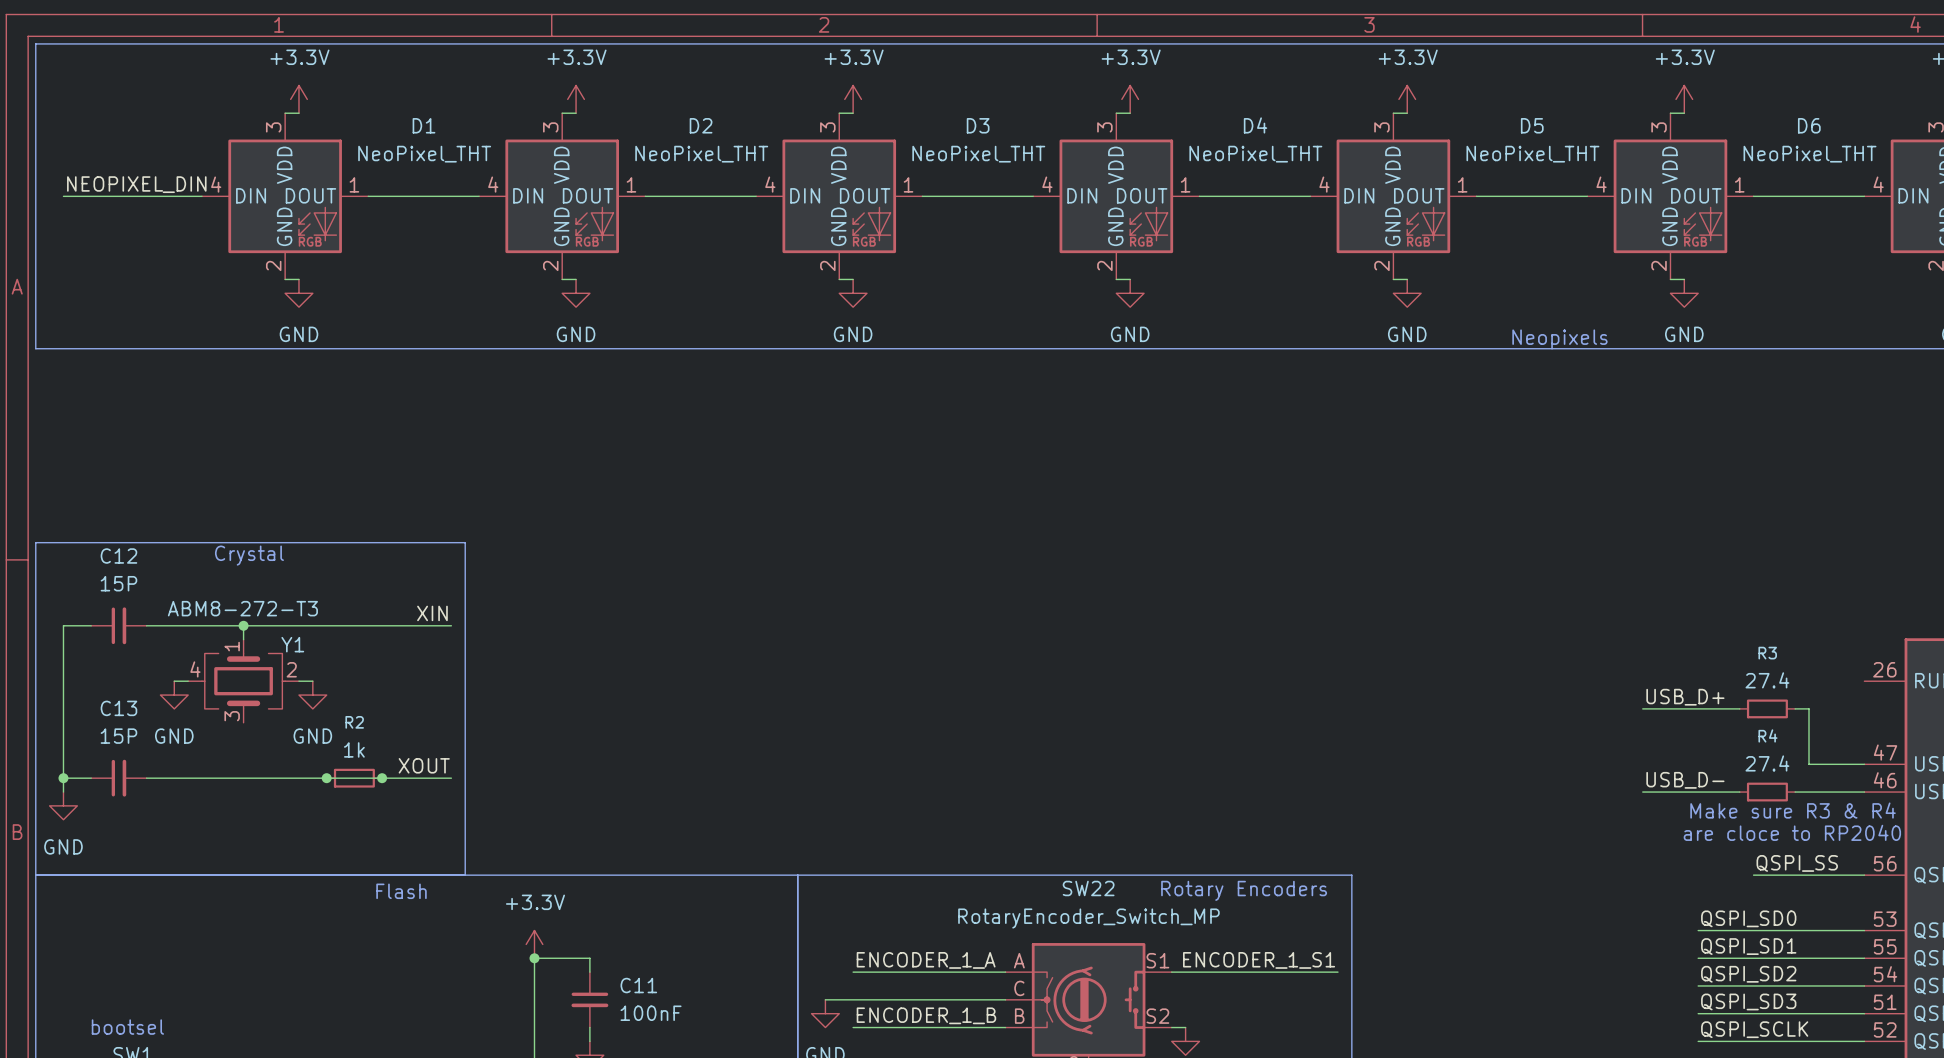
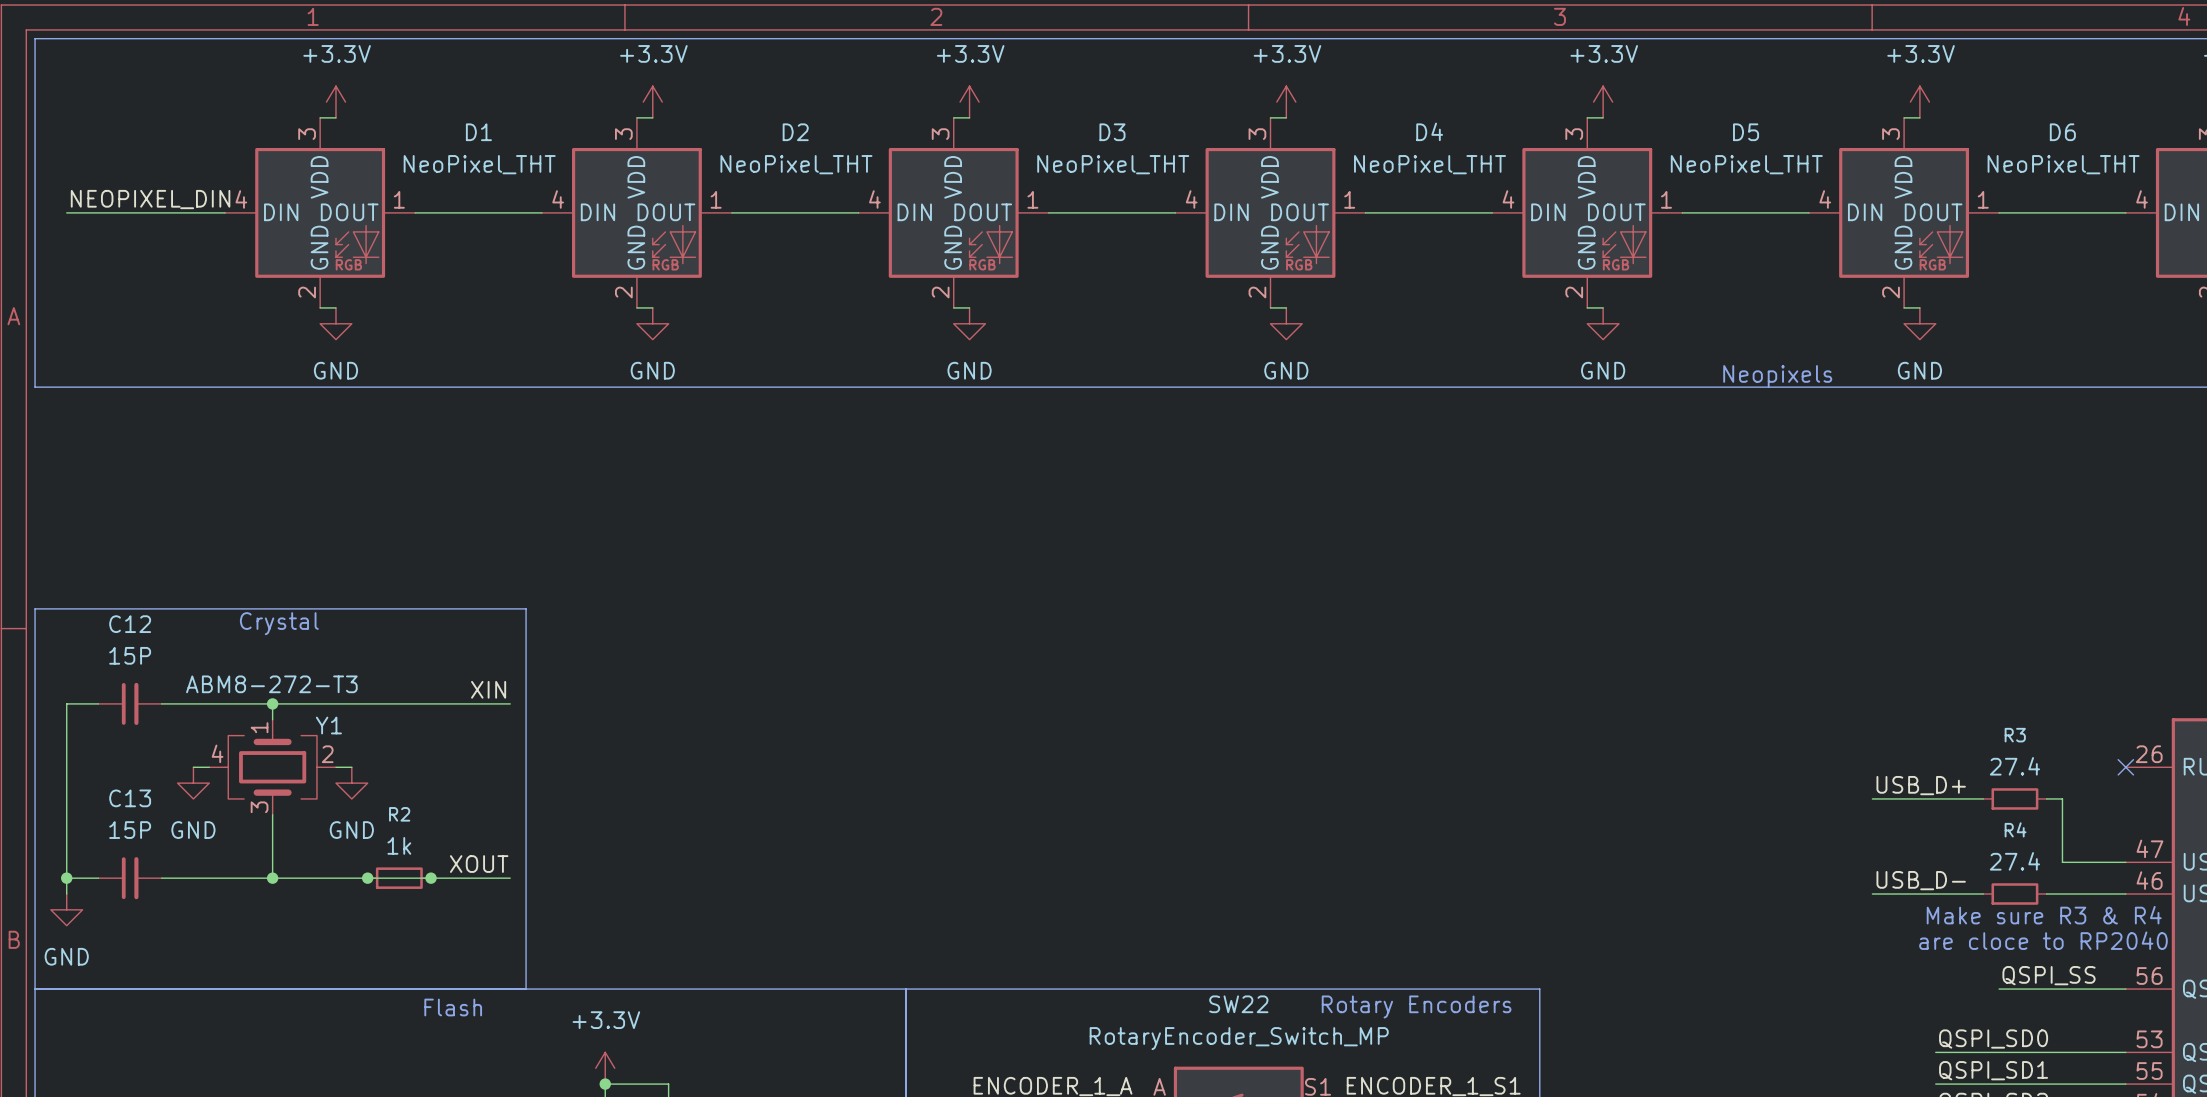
no-connect mark: none -> (2125, 767)
wire: none -> (272, 814) (272, 878)
junction: none -> (272, 878)

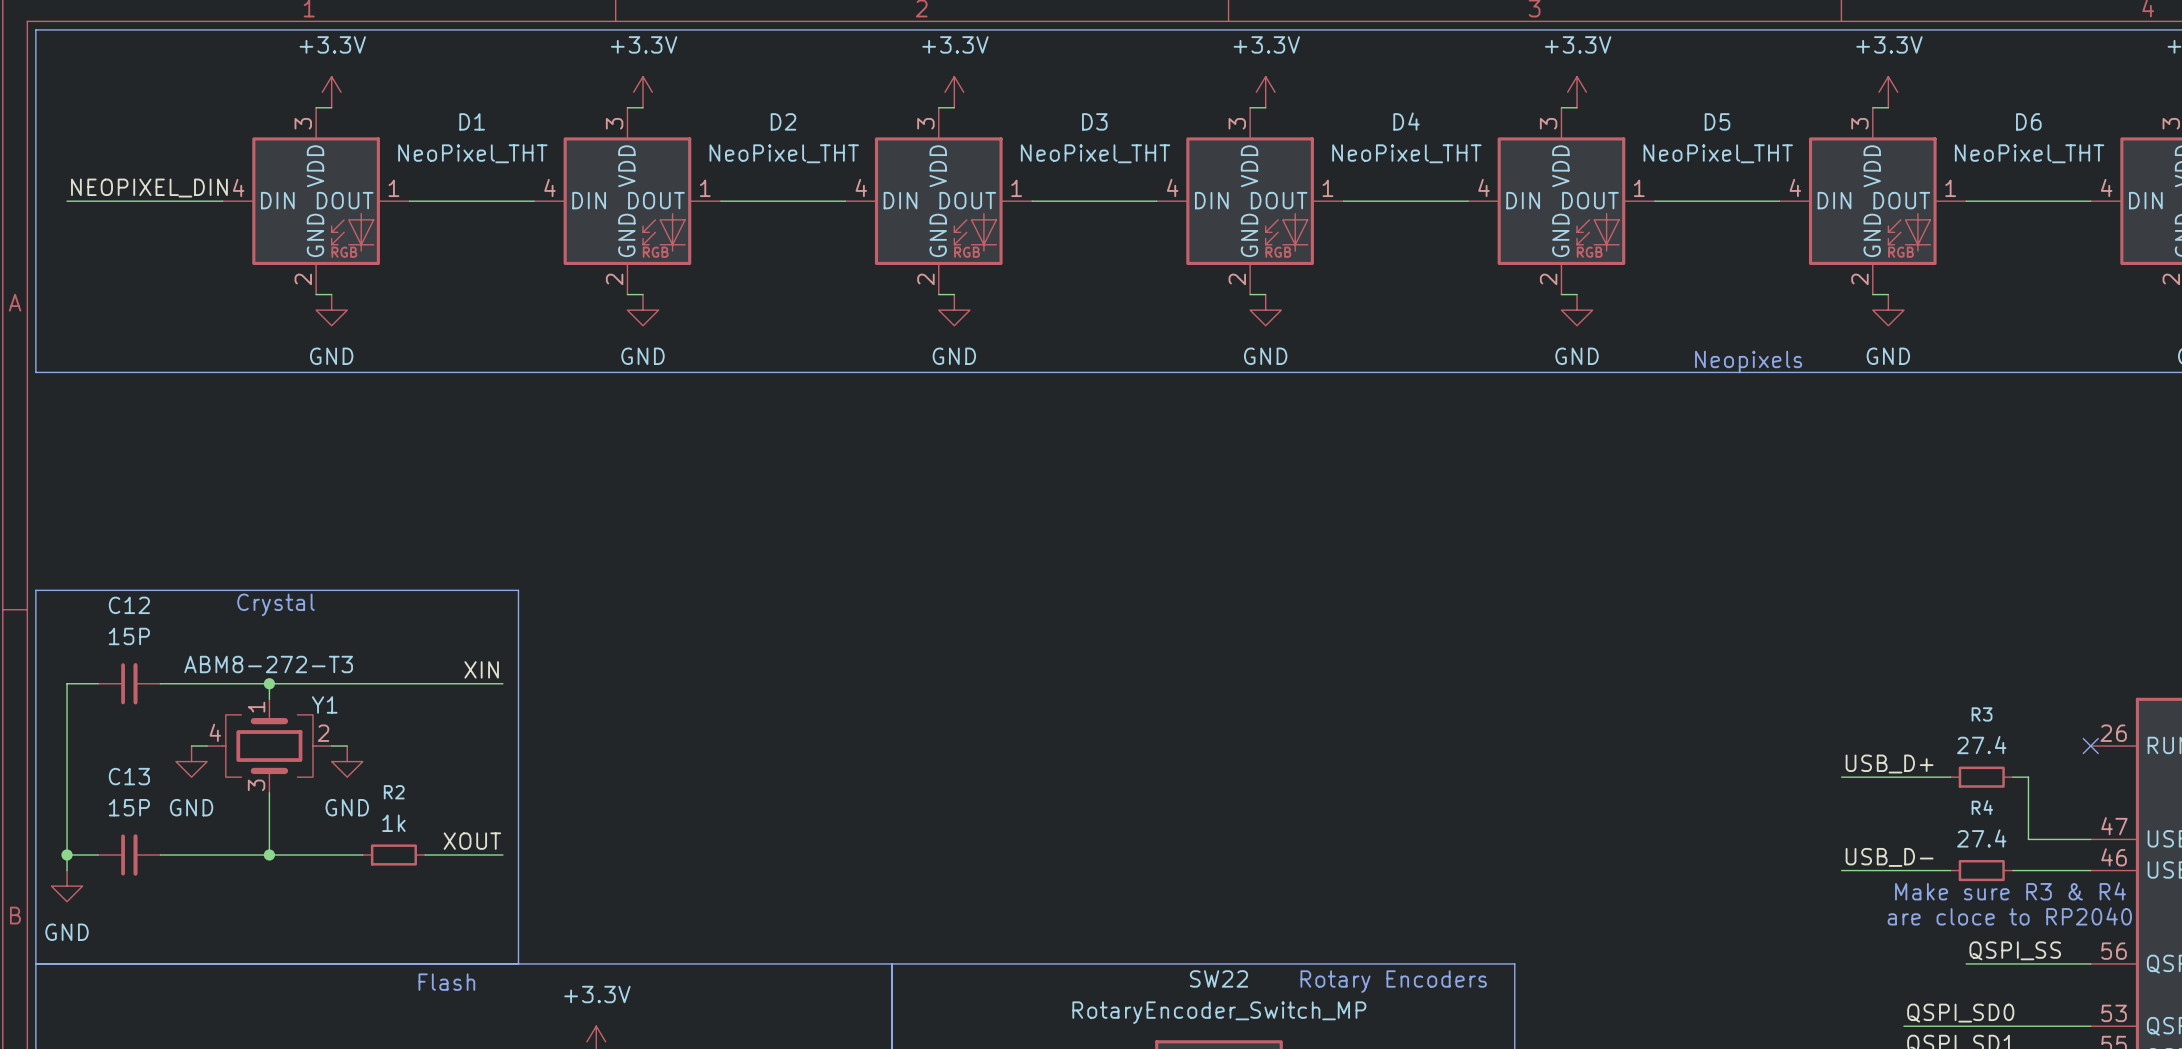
wire: (367, 878) (431, 878) -> none
junction: (367, 878) -> none
junction: (431, 878) -> none

